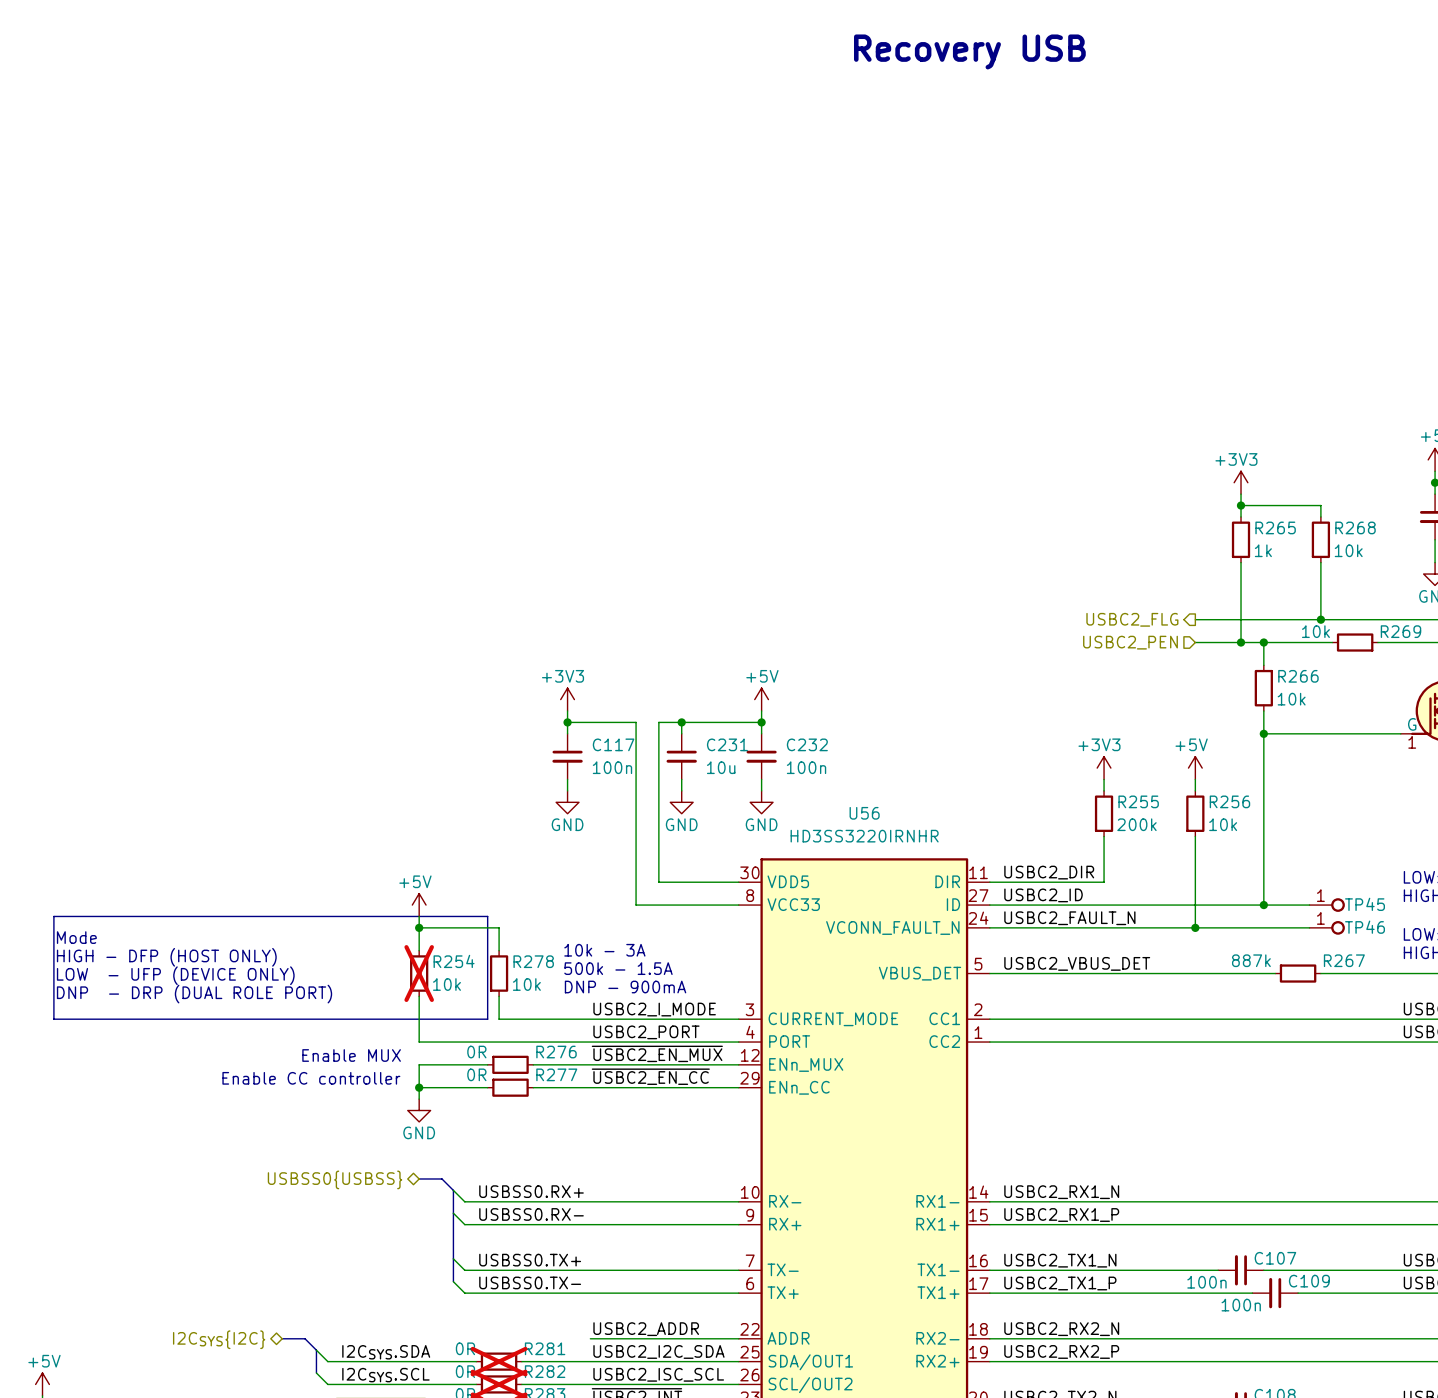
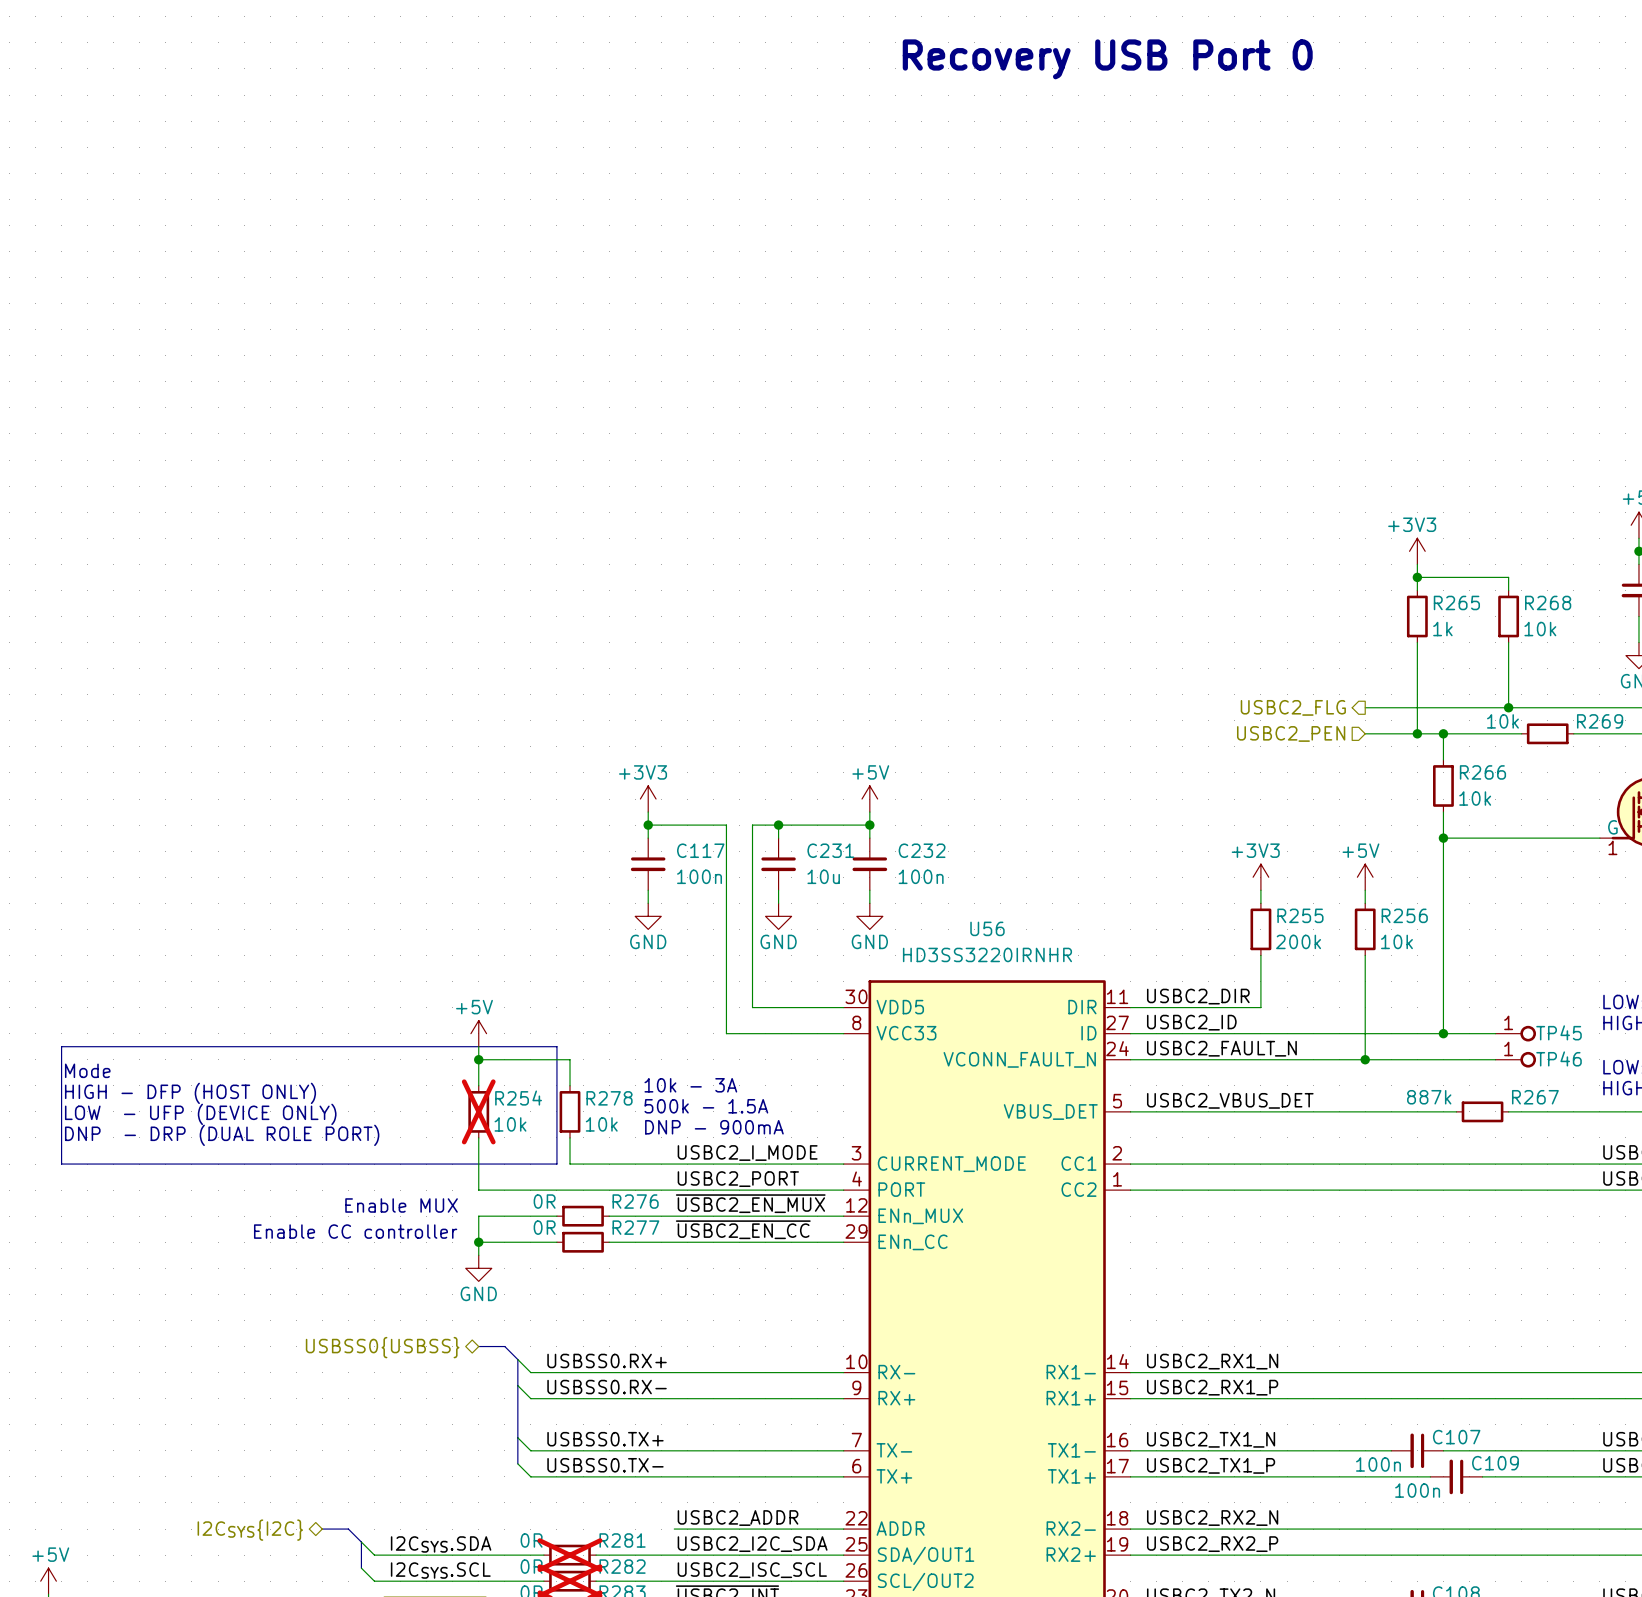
text: Recovery USB (969, 51) -> Recovery USB Port 0 (1107, 59)

